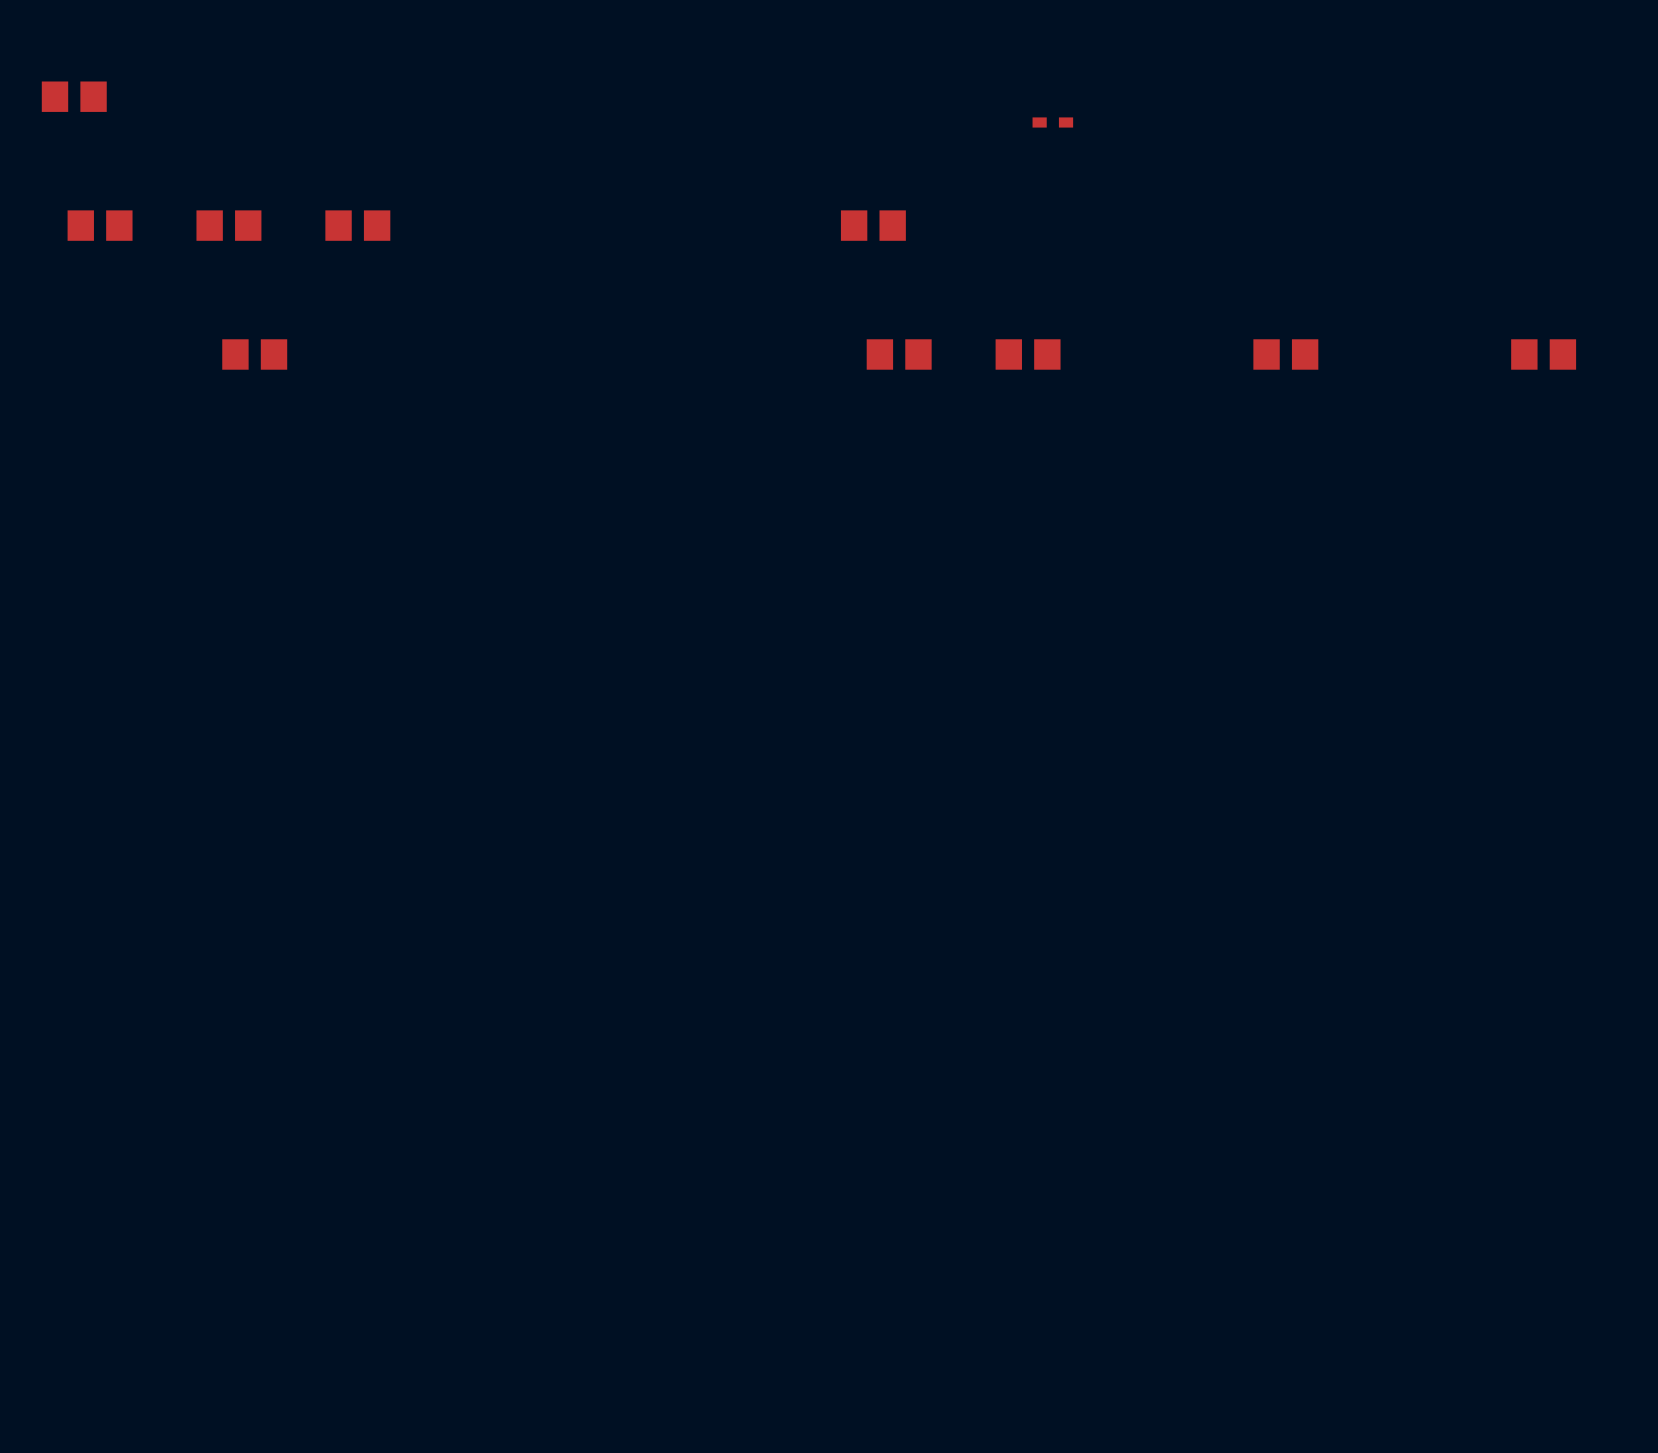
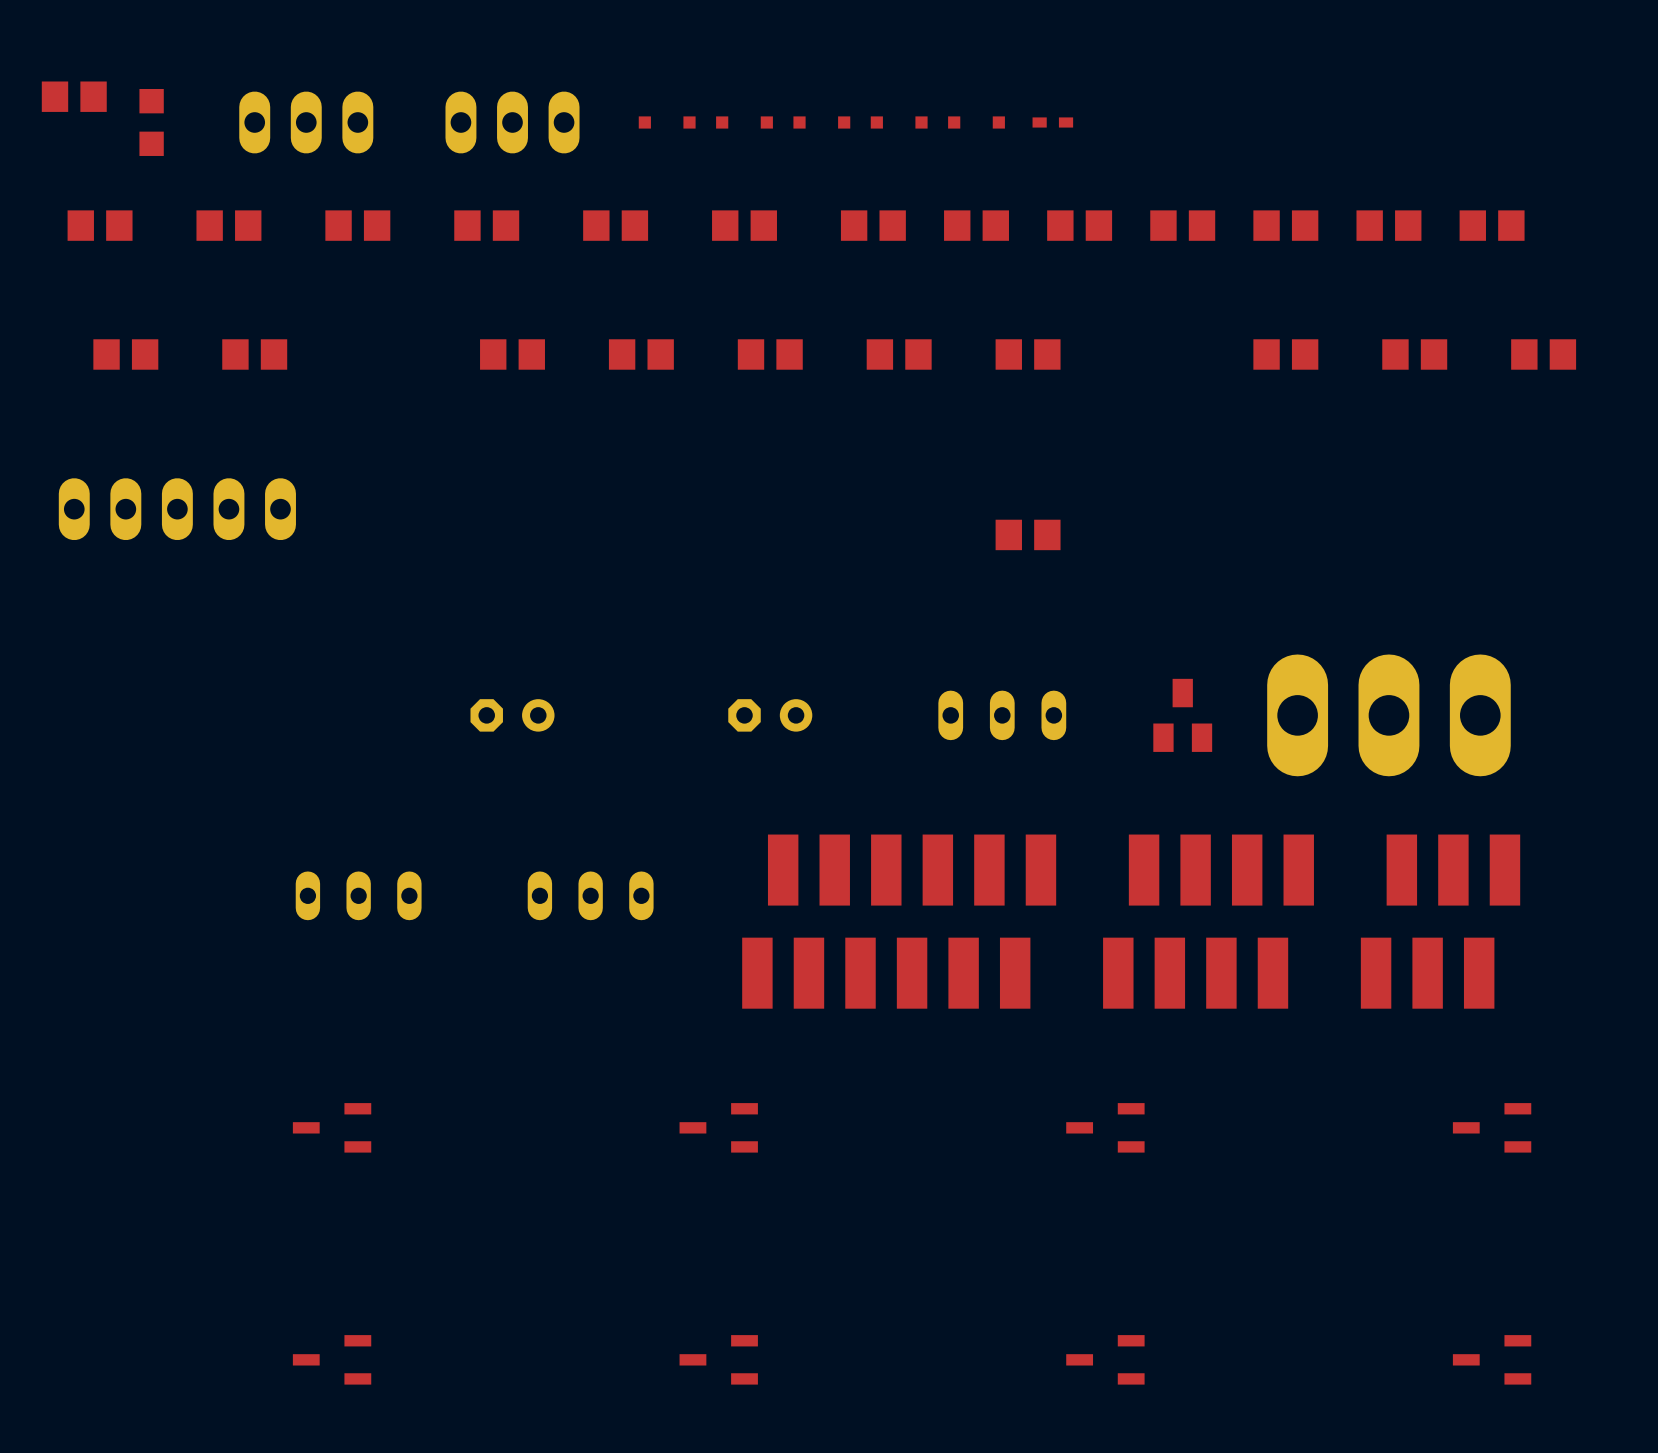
part: none -> (151, 122)
part: none -> (306, 122)
part: none -> (512, 122)
part: none -> (667, 122)
part: none -> (744, 122)
part: none -> (821, 122)
part: none -> (899, 122)
part: none -> (976, 122)
part: none -> (486, 225)
part: none -> (615, 225)
part: none -> (744, 225)
part: none -> (976, 225)
part: none -> (1079, 225)
part: none -> (1182, 225)
part: none -> (1285, 225)
part: none -> (1388, 225)
part: none -> (1492, 225)
part: none -> (125, 354)
part: none -> (512, 354)
part: none -> (641, 354)
part: none -> (770, 354)
part: none -> (1414, 354)
part: none -> (177, 509)
part: none -> (1028, 534)
part: none -> (512, 715)
part: none -> (770, 715)
part: none -> (1002, 715)
part: none -> (1182, 715)
part: none -> (1388, 715)
part: none -> (358, 895)
part: none -> (590, 895)
part: none -> (899, 921)
part: none -> (1208, 921)
part: none -> (1440, 921)
part: none -> (332, 1127)
part: none -> (718, 1127)
part: none -> (1105, 1127)
part: none -> (1492, 1127)
part: none -> (332, 1359)
part: none -> (718, 1359)
part: none -> (1105, 1359)
part: none -> (1492, 1359)

